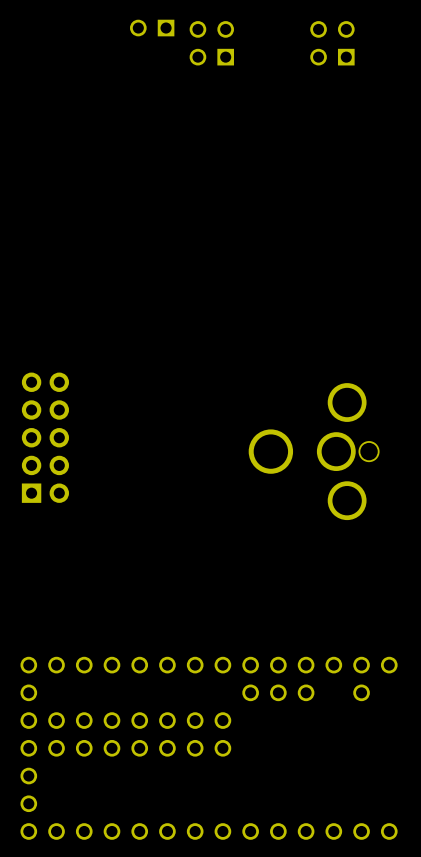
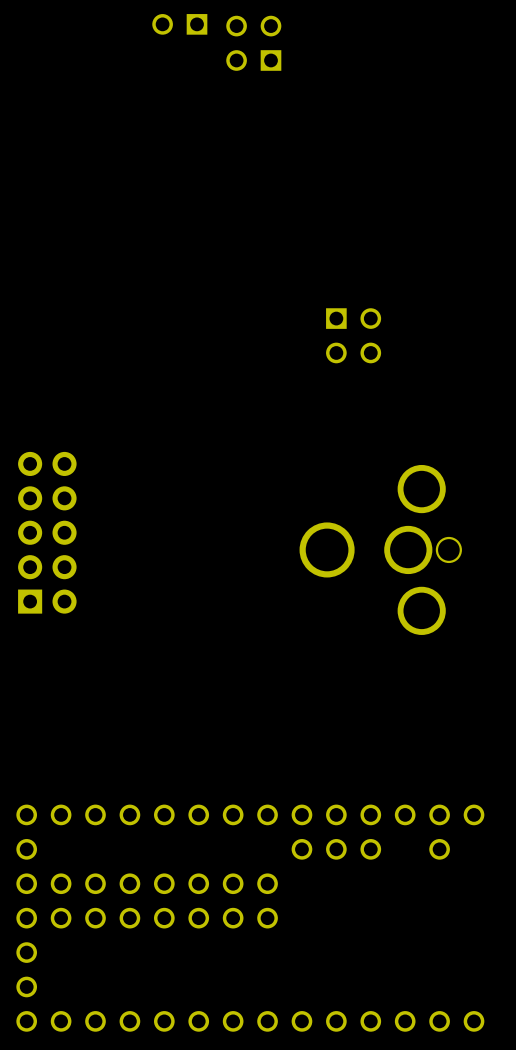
part rotation: 0° (332, 43) -> 180° (353, 335)
part position: (332, 43) -> (353, 335)

